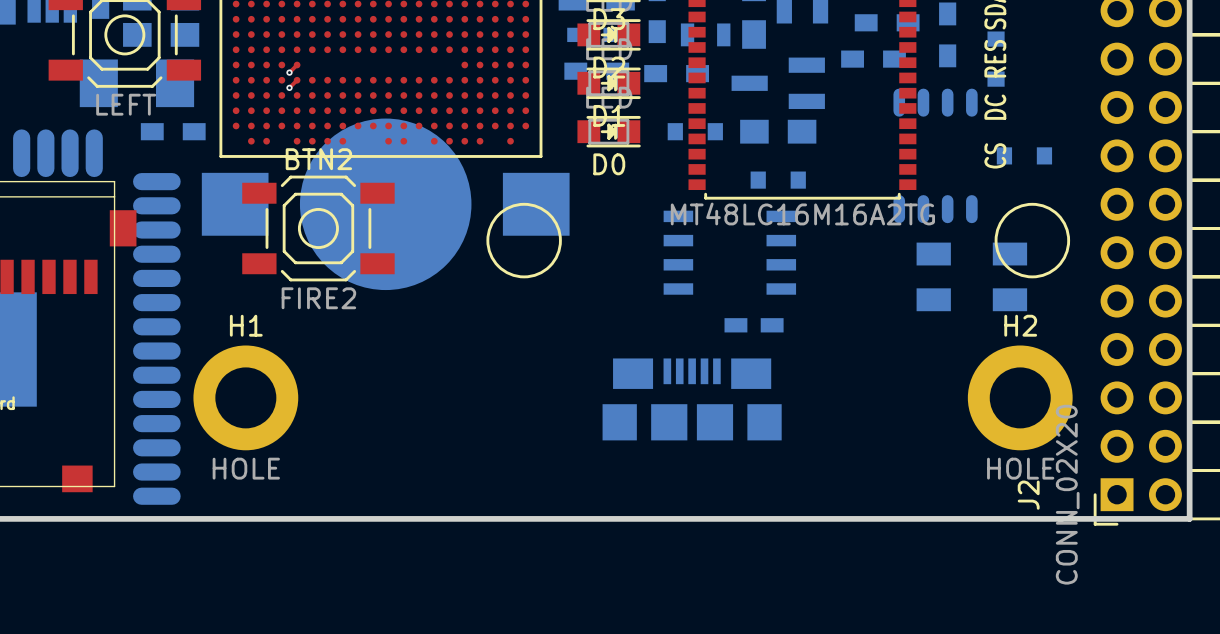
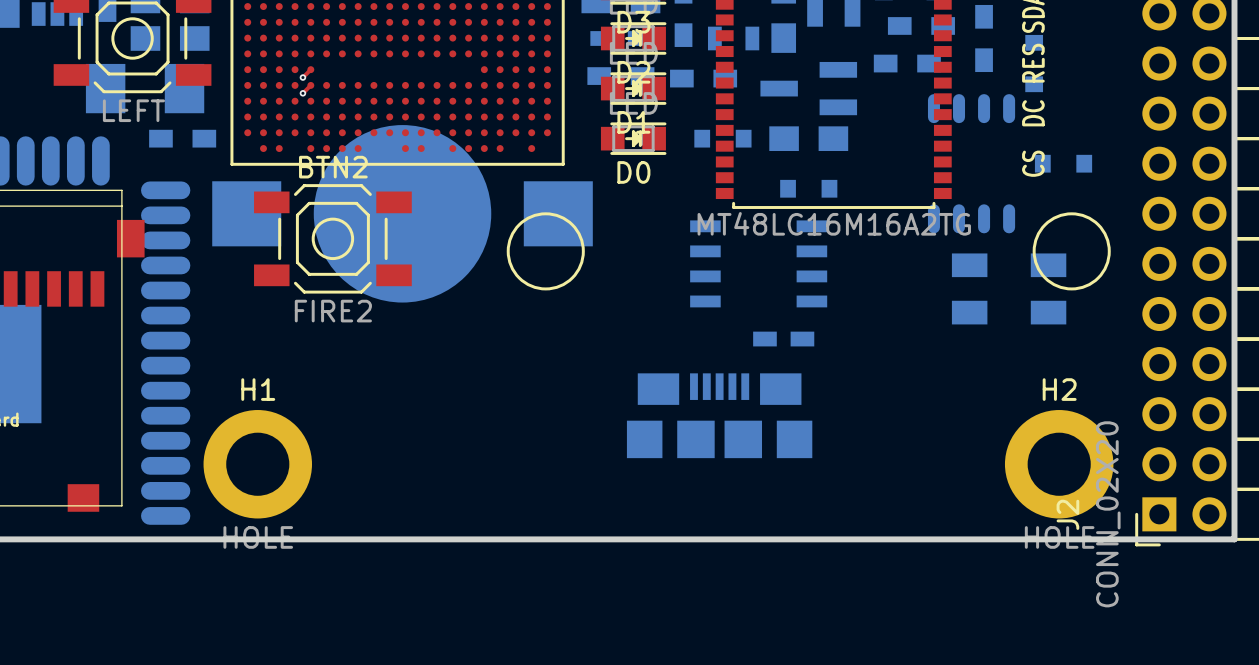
H1 position: (245, 397) -> (257, 464)
H2 position: (1020, 397) -> (1059, 464)

